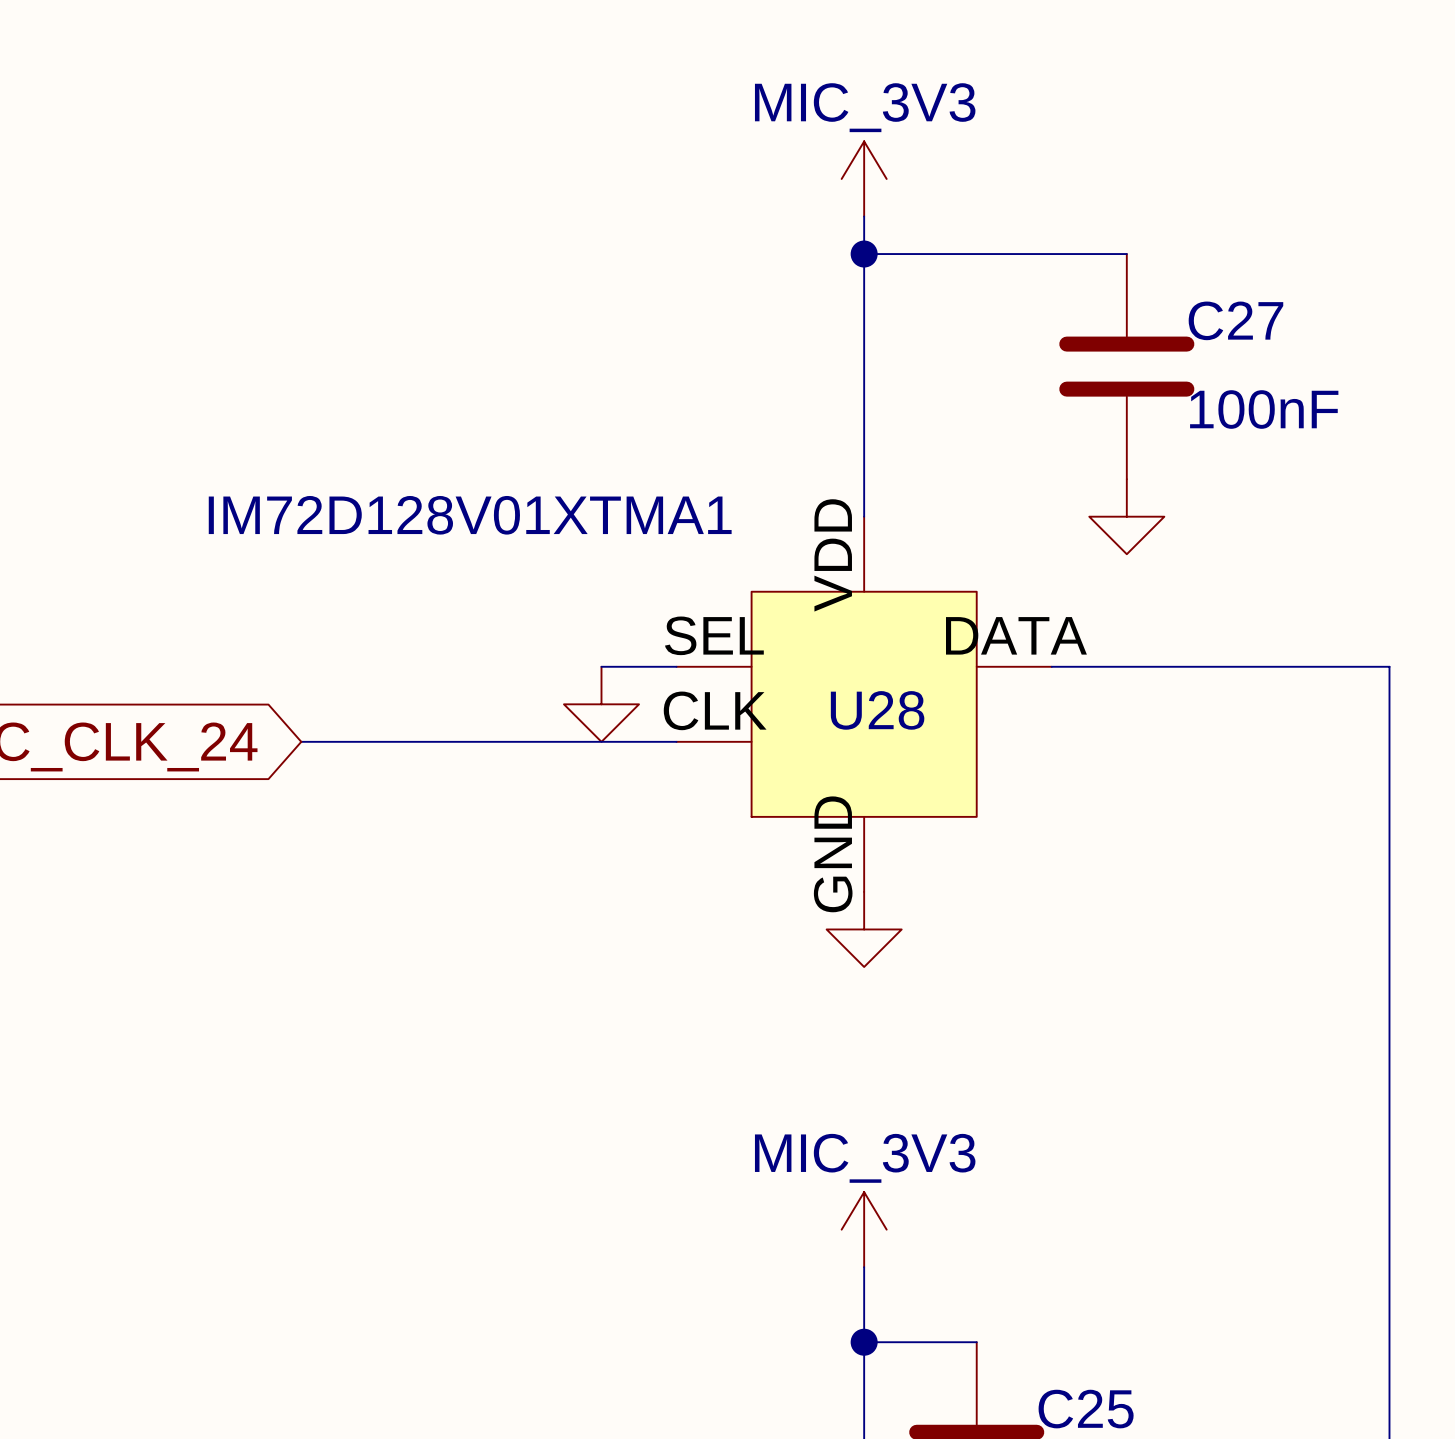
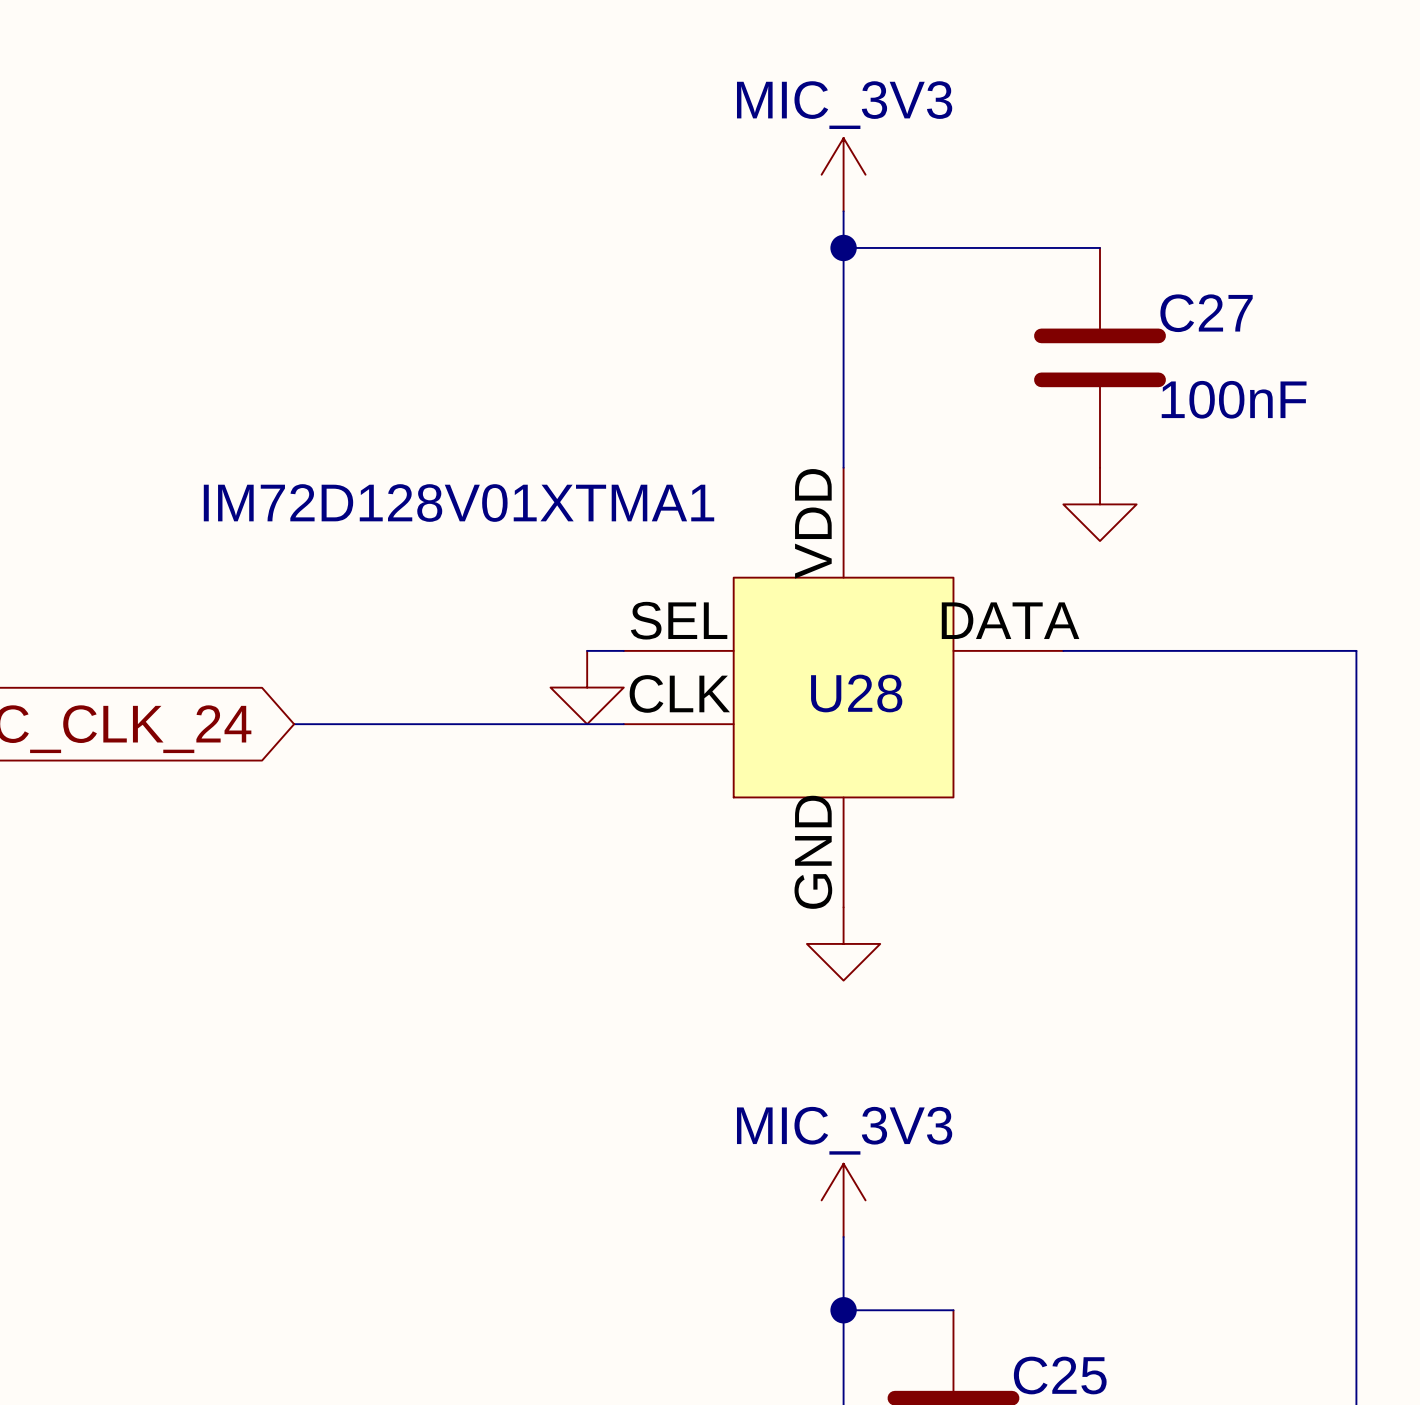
U28 symbol: [676, 516, 1052, 892] -> [623, 467, 1064, 908]
power symbol position: (864, 929) -> (843, 943)

